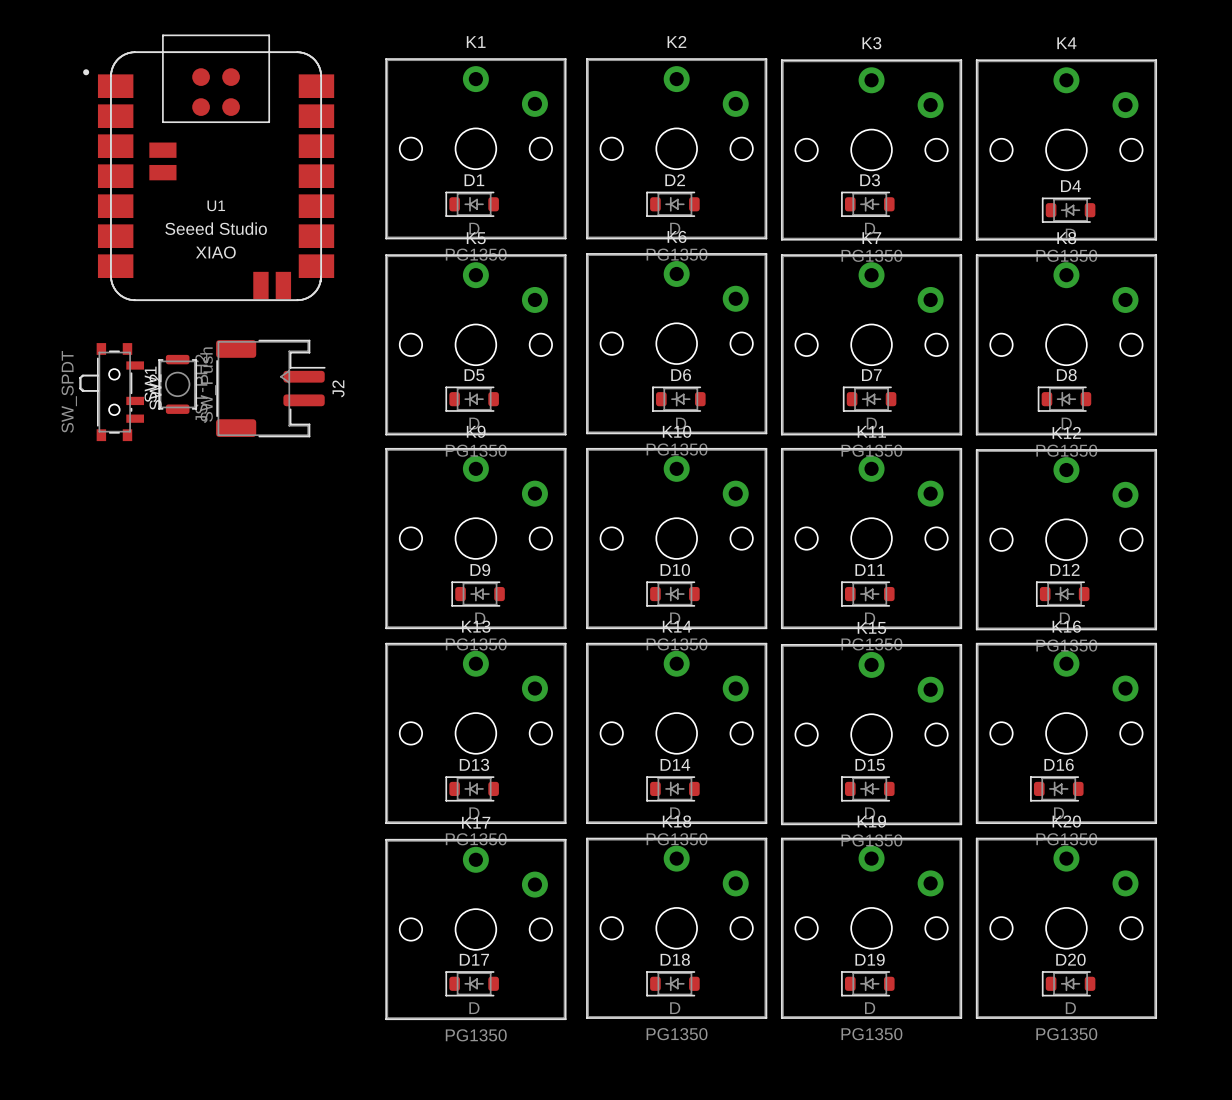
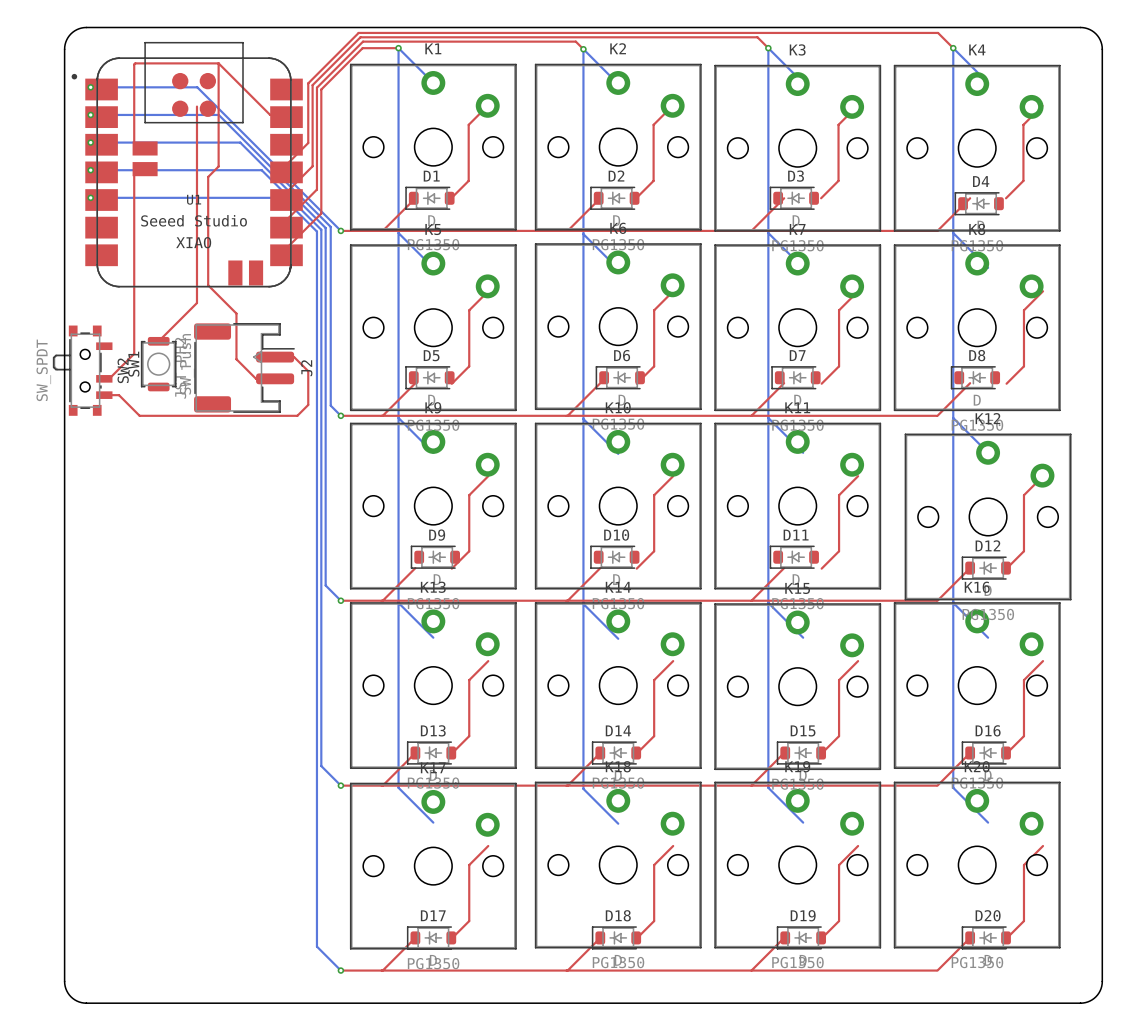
board edge: none -> (86, 27) (1080, 27) (1089, 29) (1095, 33) (1100, 39) (1102, 49) (1102, 981) (1100, 990) (1095, 996) (1087, 1001) (1080, 1003) (86, 1003) (79, 1001) (70, 996) (65, 988) (64, 981) (64, 49) (66, 39) (70, 33) (76, 29) (86, 27)
top track: none -> (398, 48) (362, 48) (321, 89) (321, 213) (281, 253) (275, 253)
via: none -> (398, 48)
top track: none -> (768, 48) (757, 37) (360, 37) (312, 85) (312, 166) (281, 197) (275, 197)
via: none -> (768, 48)
top track: none -> (953, 48) (938, 32) (358, 32) (308, 83) (308, 143) (281, 170) (275, 170)
via: none -> (953, 48)
top track: none -> (583, 49) (575, 41) (363, 41) (316, 87) (316, 189) (281, 225) (275, 225)
via: none -> (583, 49)
top track: none -> (218, 63) (218, 166) (208, 176) (208, 285) (236, 313) (236, 359) (256, 378) (275, 378)
top track: none -> (218, 63) (135, 63) (134, 146)
top track: none -> (218, 63) (270, 114) (275, 114)
bottom track: none -> (433, 82) (398, 48) (398, 787) (433, 822)
bottom track: none -> (803, 82) (768, 48) (768, 787) (803, 822)
bottom track: none -> (988, 82) (953, 48) (953, 787) (988, 822)
bottom track: none -> (618, 84) (583, 49) (583, 788) (618, 823)
bottom track: none -> (90, 87) (197, 87) (340, 230)
via: none -> (90, 87)
top track: none -> (487, 105) (468, 124) (468, 180) (451, 198)
top track: none -> (672, 105) (653, 124) (653, 180) (636, 198)
top track: none -> (857, 105) (838, 124) (838, 180) (821, 198)
top track: none -> (1042, 105) (1023, 124) (1023, 180) (1006, 198)
top track: none -> (196, 106) (196, 303) (158, 341)
bottom track: none -> (90, 114) (218, 114) (330, 226) (330, 405) (340, 415)
via: none -> (90, 114)
bottom track: none -> (90, 142) (240, 142) (325, 227) (325, 585) (340, 600)
via: none -> (90, 142)
top track: none -> (134, 166) (134, 353) (109, 378) (104, 378)
bottom track: none -> (90, 170) (261, 170) (321, 229) (321, 766) (340, 785)
via: none -> (90, 170)
bottom track: none -> (90, 197) (283, 197) (316, 231) (316, 946) (340, 970)
via: none -> (90, 197)
top track: none -> (415, 198) (382, 230)
top track: none -> (600, 198) (567, 230)
top track: none -> (784, 198) (751, 230)
top track: none -> (970, 198) (937, 230) (340, 230)
via: none -> (340, 230)
bottom track: none -> (398, 233) (433, 267)
bottom track: none -> (768, 233) (803, 267)
bottom track: none -> (953, 233) (988, 267)
bottom track: none -> (583, 234) (618, 268)
top track: none -> (488, 291) (469, 310) (469, 366) (451, 383)
top track: none -> (673, 291) (654, 310) (654, 366) (636, 383)
top track: none -> (858, 291) (839, 310) (839, 366) (821, 383)
top track: none -> (1043, 291) (1023, 310) (1023, 366) (1006, 383)
top track: none -> (275, 357) (294, 357) (308, 371) (308, 404) (297, 415) (139, 415) (118, 395) (104, 395)
SW2 position: (111, 392) -> (82, 370)
top track: none -> (415, 383) (382, 415)
top track: none -> (600, 383) (567, 415)
top track: none -> (784, 383) (751, 415)
top track: none -> (970, 383) (937, 415)
top track: none -> (340, 415) (936, 415)
via: none -> (340, 415)
bottom track: none -> (398, 417) (433, 452)
bottom track: none -> (768, 417) (803, 452)
bottom track: none -> (953, 417) (988, 452)
bottom track: none -> (583, 419) (618, 453)
top track: none -> (488, 476) (469, 495) (469, 551) (451, 568)
top track: none -> (673, 476) (654, 495) (654, 551) (636, 568)
top track: none -> (858, 476) (839, 495) (839, 551) (821, 568)
top track: none -> (1043, 476) (1023, 495) (1023, 551) (1006, 568)
K12 position: (1066, 539) -> (988, 516)
D12 position: (1062, 594) -> (986, 568)
top track: none -> (415, 568) (382, 600)
top track: none -> (600, 568) (567, 600)
top track: none -> (784, 568) (751, 600)
top track: none -> (970, 568) (937, 600)
top track: none -> (340, 600) (936, 600)
via: none -> (340, 600)
bottom track: none -> (398, 602) (433, 637)
bottom track: none -> (768, 602) (803, 637)
bottom track: none -> (953, 602) (988, 637)
bottom track: none -> (583, 603) (618, 638)
top track: none -> (488, 661) (469, 680) (469, 736) (451, 753)
top track: none -> (673, 661) (654, 680) (654, 736) (636, 753)
top track: none -> (858, 661) (839, 680) (839, 736) (821, 753)
top track: none -> (1043, 661) (1023, 680) (1023, 736) (1006, 753)
D13 position: (472, 788) -> (431, 753)
D14 position: (673, 788) -> (616, 753)
D15 position: (867, 788) -> (801, 753)
D16 position: (1056, 788) -> (986, 753)
top track: none -> (415, 753) (382, 785)
top track: none -> (600, 753) (567, 785)
top track: none -> (784, 753) (751, 785)
top track: none -> (970, 753) (937, 785)
top track: none -> (340, 785) (936, 785)
via: none -> (340, 785)
top track: none -> (488, 846) (469, 865) (469, 921) (451, 938)
top track: none -> (673, 846) (654, 865) (654, 921) (636, 938)
top track: none -> (858, 846) (839, 865) (839, 921) (821, 938)
top track: none -> (1043, 846) (1023, 865) (1023, 921) (1006, 938)
D17 position: (472, 983) -> (431, 937)
D18 position: (673, 983) -> (616, 937)
D19 position: (867, 983) -> (801, 937)
D20 position: (1068, 983) -> (986, 937)
top track: none -> (415, 937) (382, 970)
top track: none -> (600, 937) (567, 970)
top track: none -> (784, 937) (751, 970)
top track: none -> (970, 937) (937, 970)
top track: none -> (340, 970) (936, 970)
via: none -> (340, 970)

